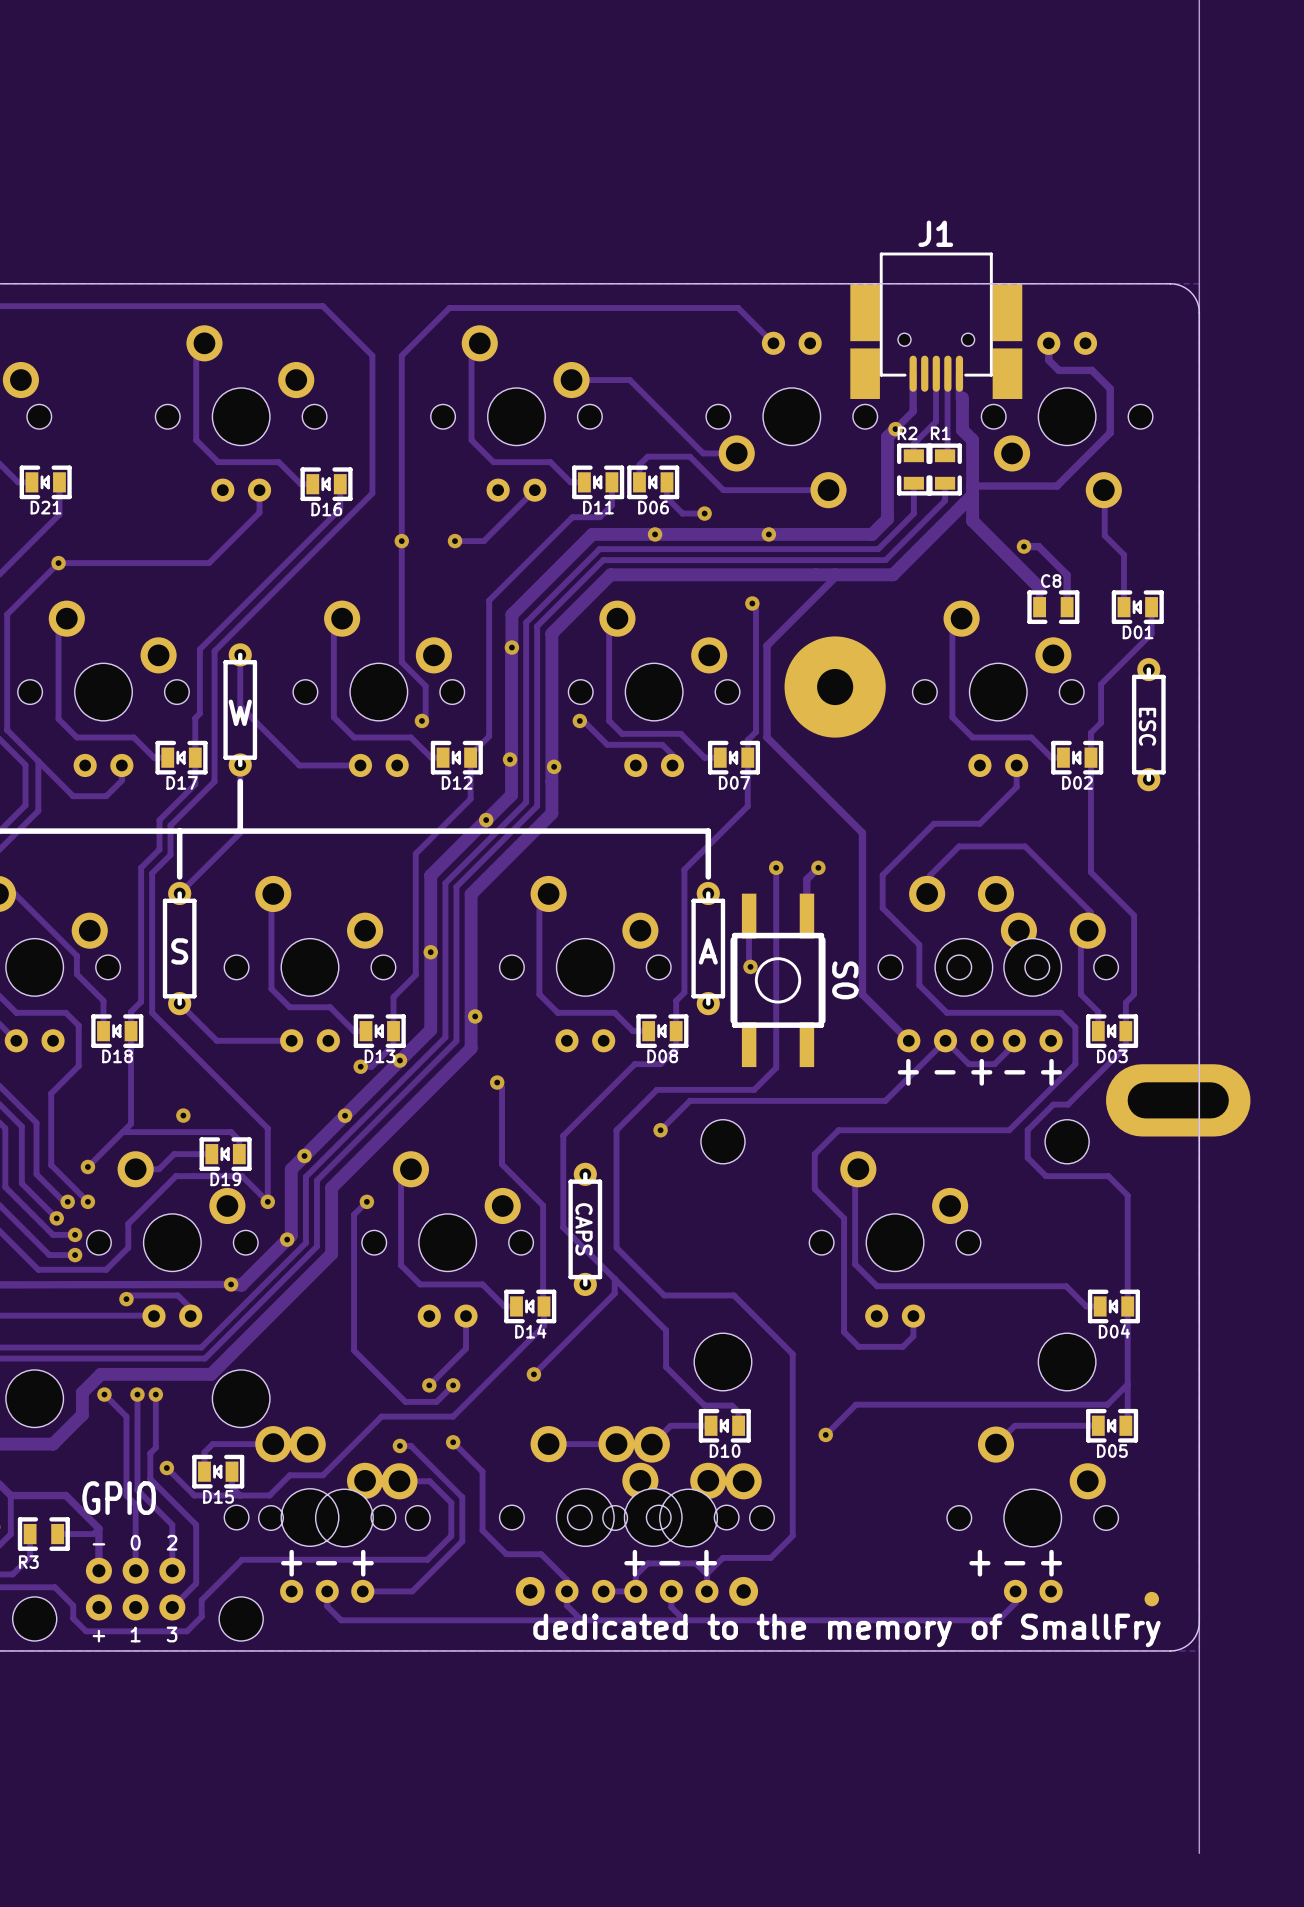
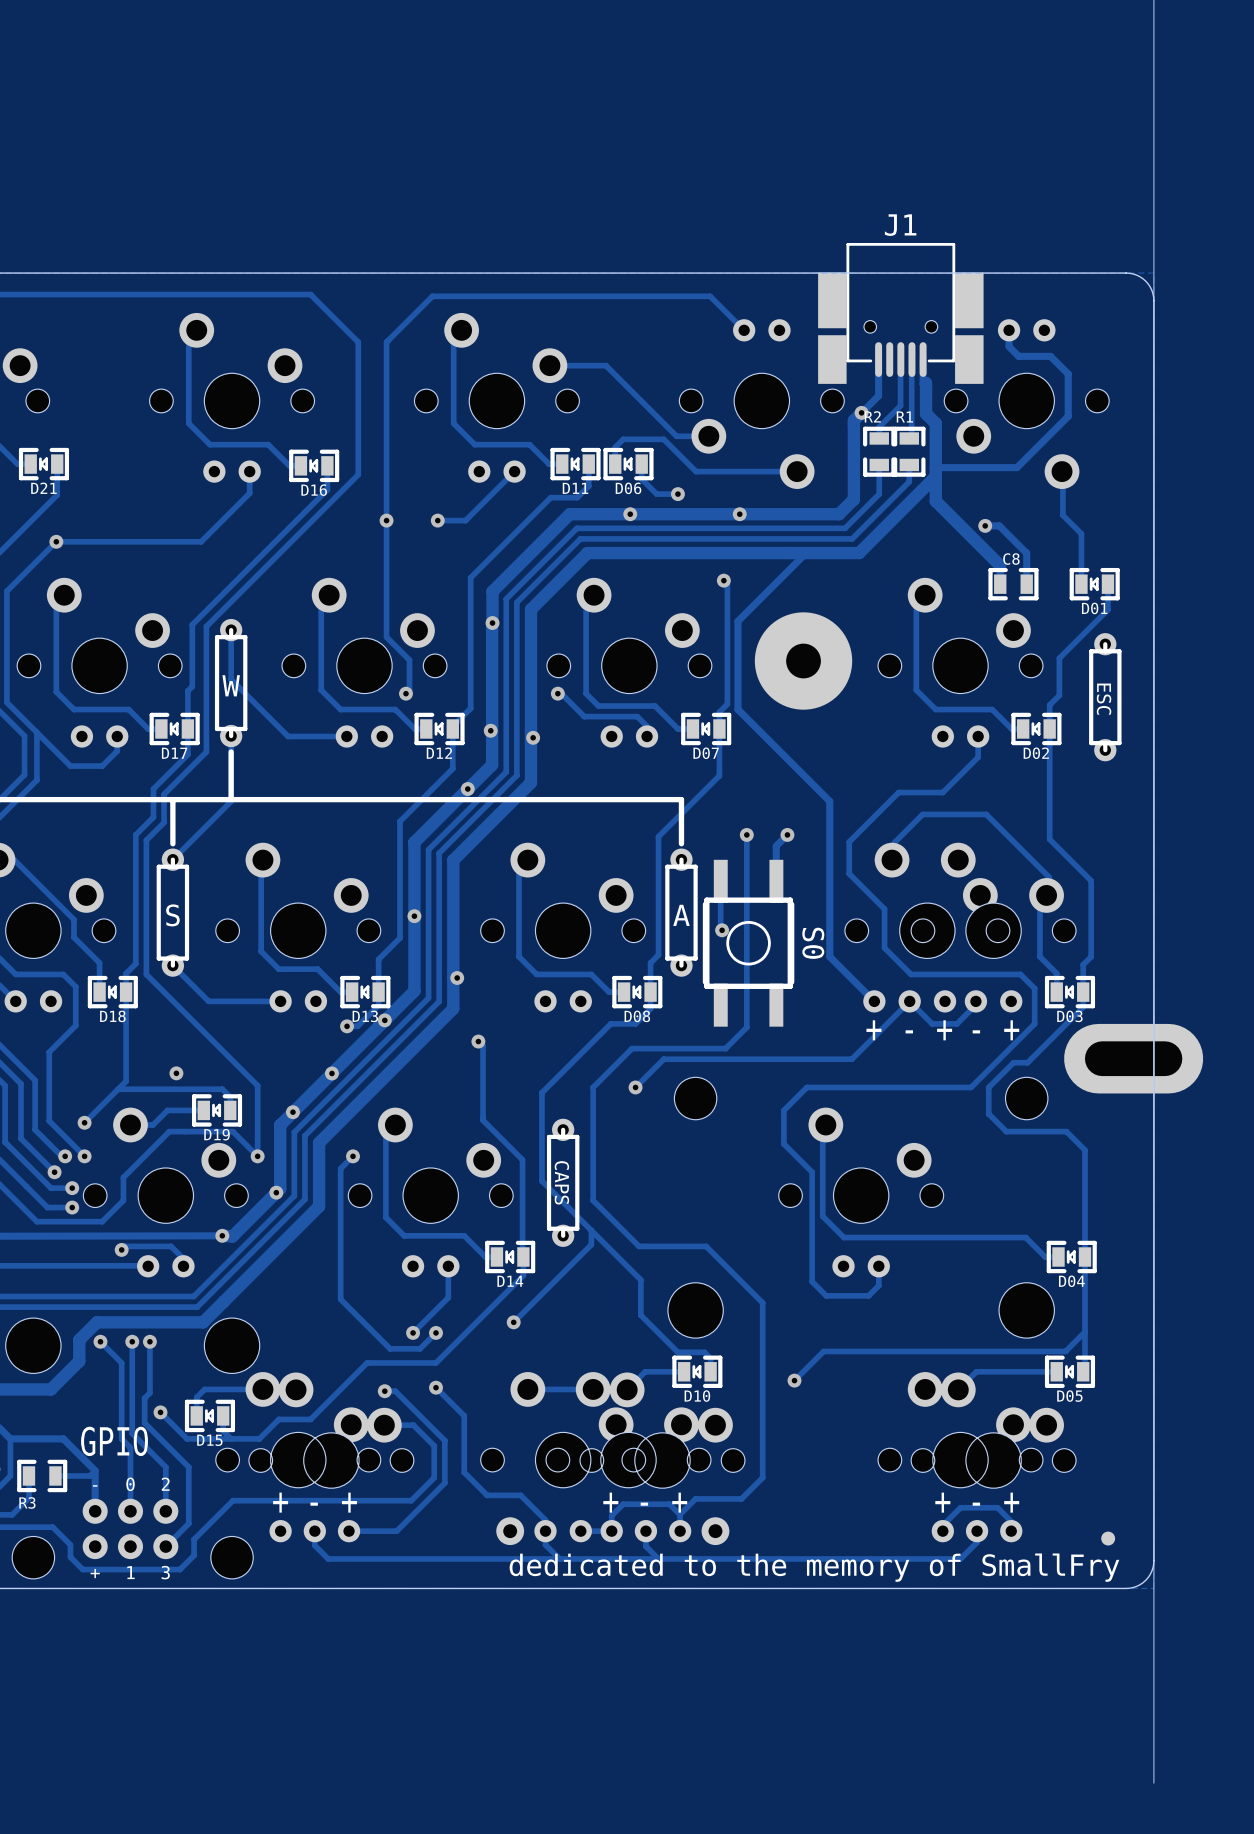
part: none -> (960, 1429)
track: none -> (942, 1525) (960, 1507) (997, 1507) (1011, 1521) (1011, 1531)
part: none -> (942, 1531)

